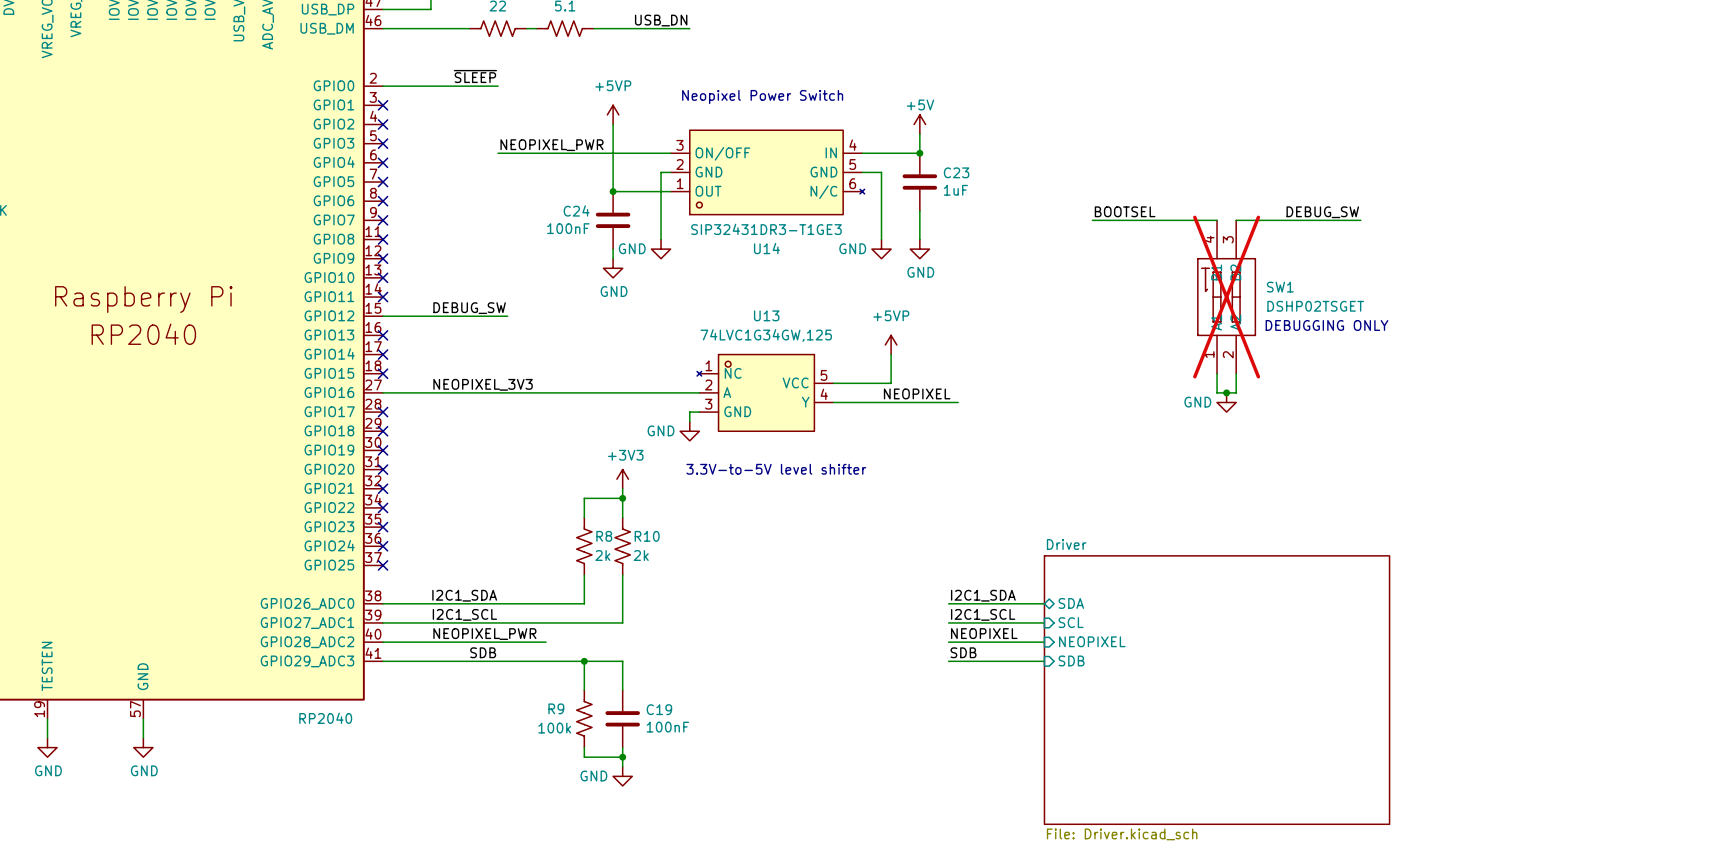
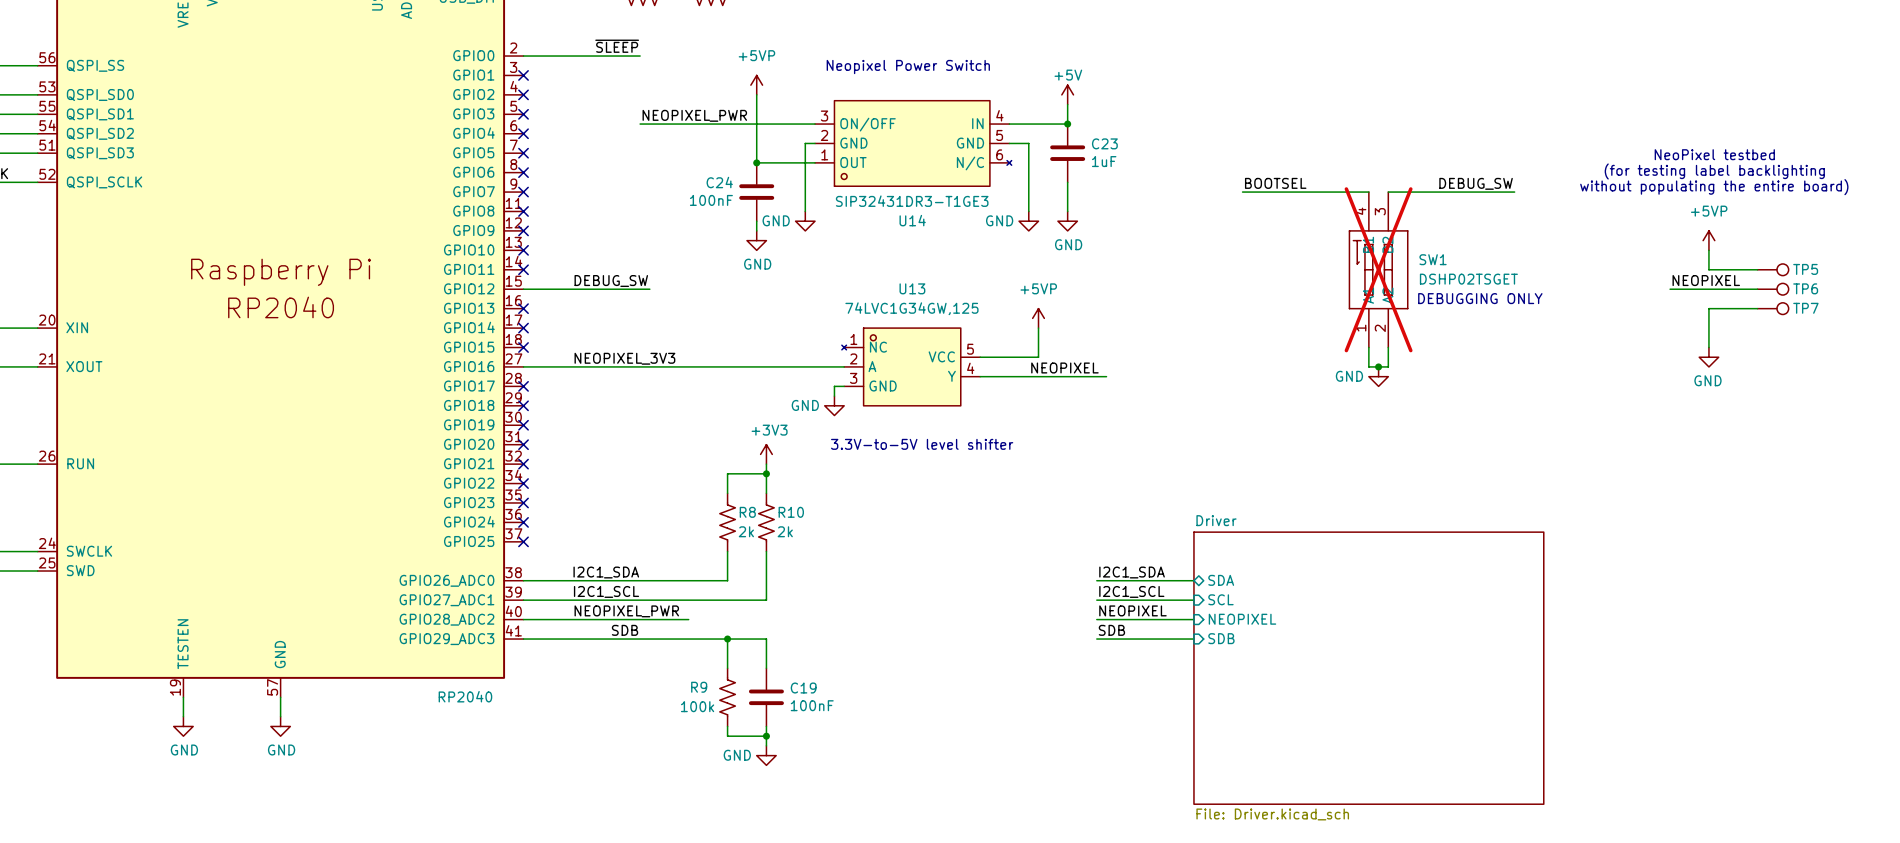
text: none -> NeoPixel testbed (1714, 154)
text: none -> (for testing label backlighting (1714, 171)
text: none -> without populating the entire board) (1714, 187)
power symbol: none -> +5VP (1708, 240)
wire: none -> (1708, 250) (1708, 269) (1757, 269)
TP5: none -> (1773, 269)
label: none -> NEOPIXEL (1706, 280)
wire: none -> (1670, 289) (1757, 289)
TP6: none -> (1773, 289)
wire: none -> (1757, 308) (1708, 308) (1708, 347)
TP7: none -> (1773, 308)
power symbol: none -> GND (1708, 357)

